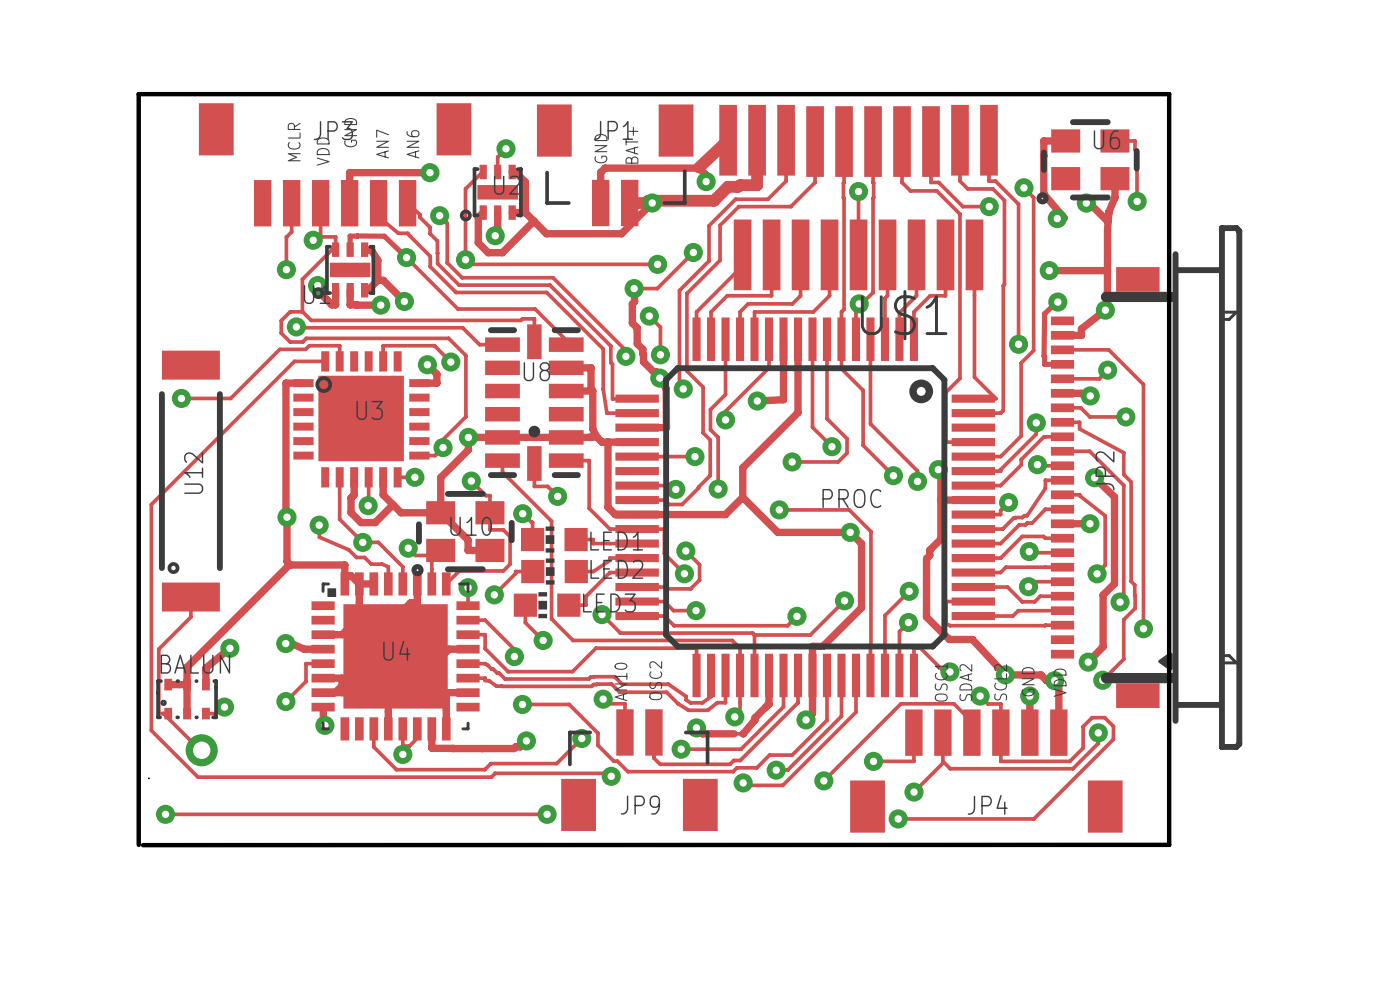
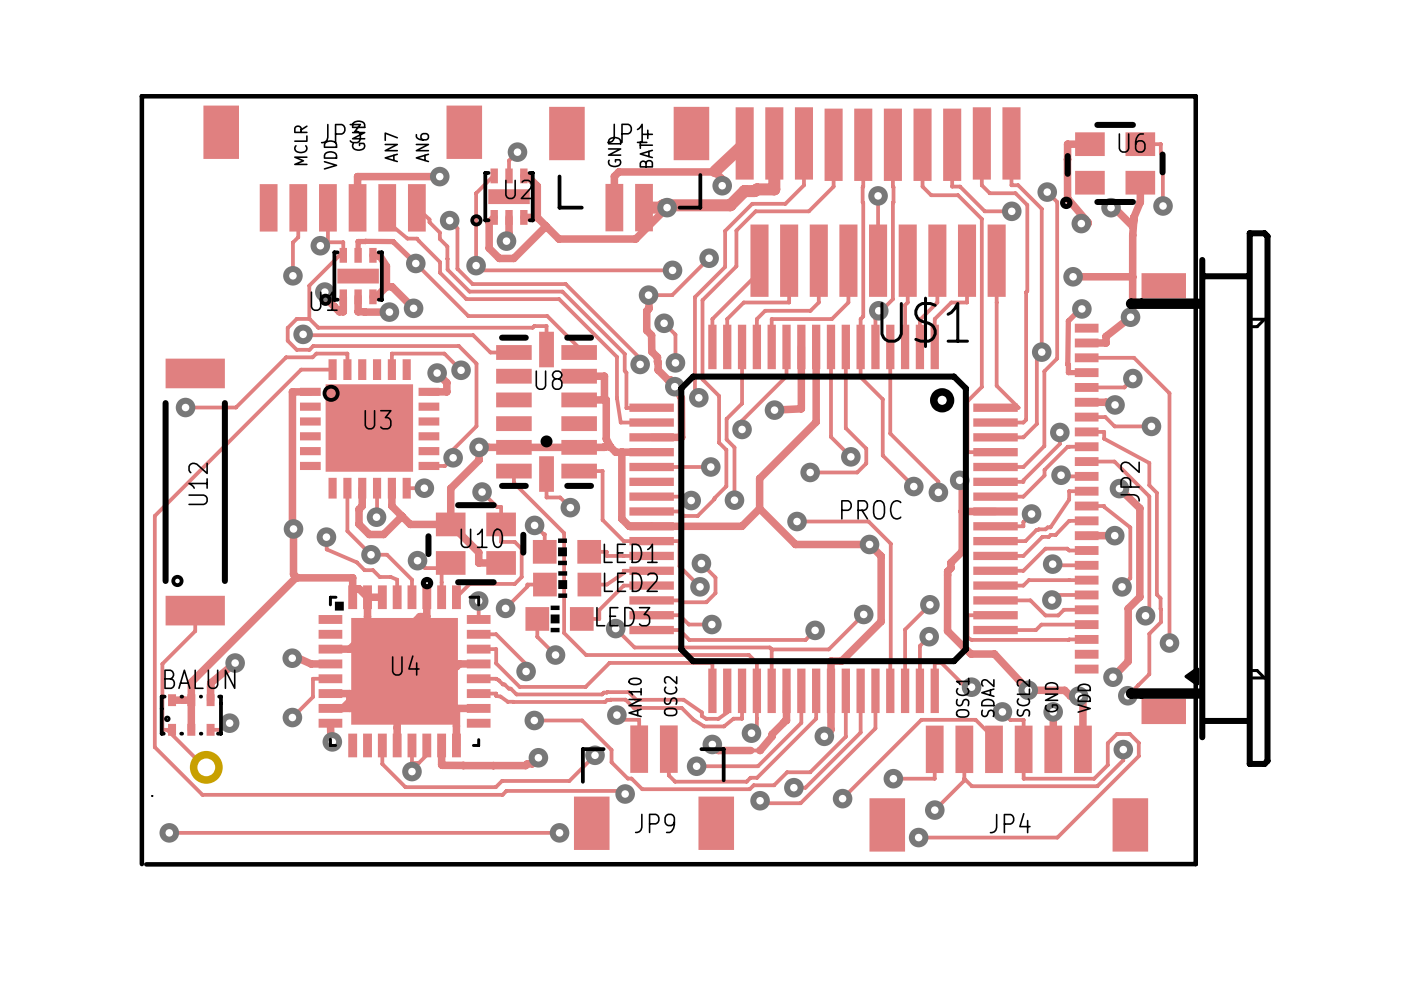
track: none -> (1041, 352) (1036, 357) (1036, 423) (1023, 437) (995, 437)

